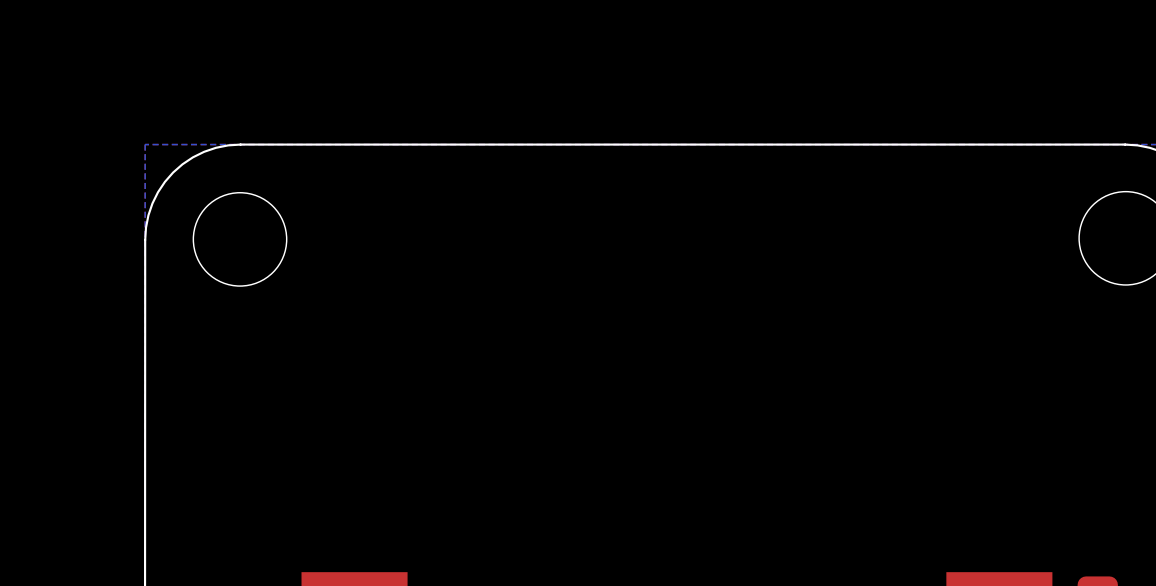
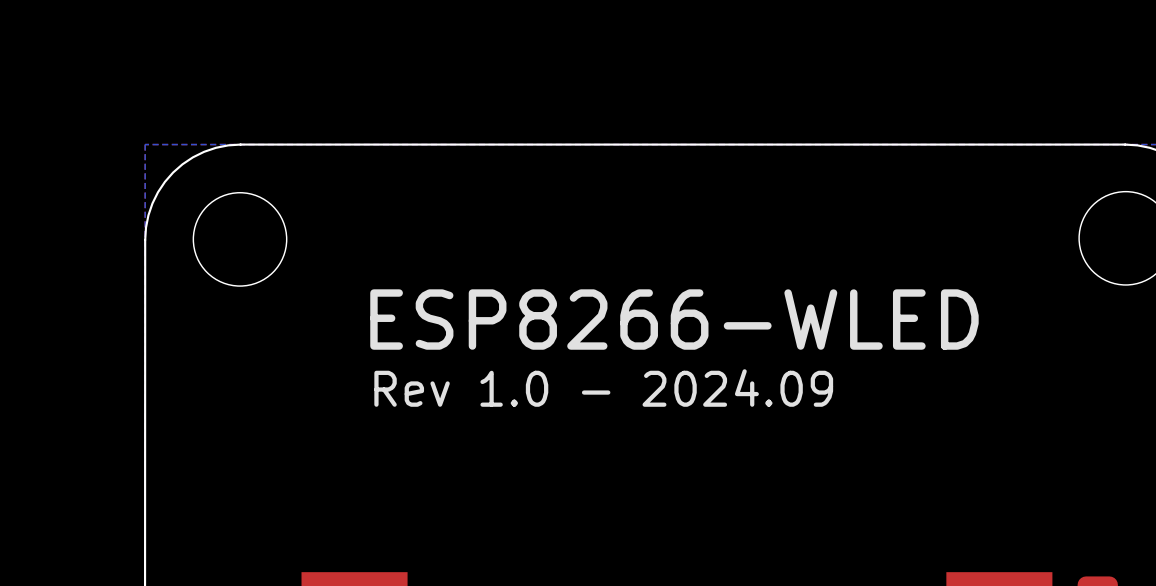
text: none -> ESP8266-WLED (674, 319)
text: none -> Rev 1.0 - 2024.09 (603, 388)

